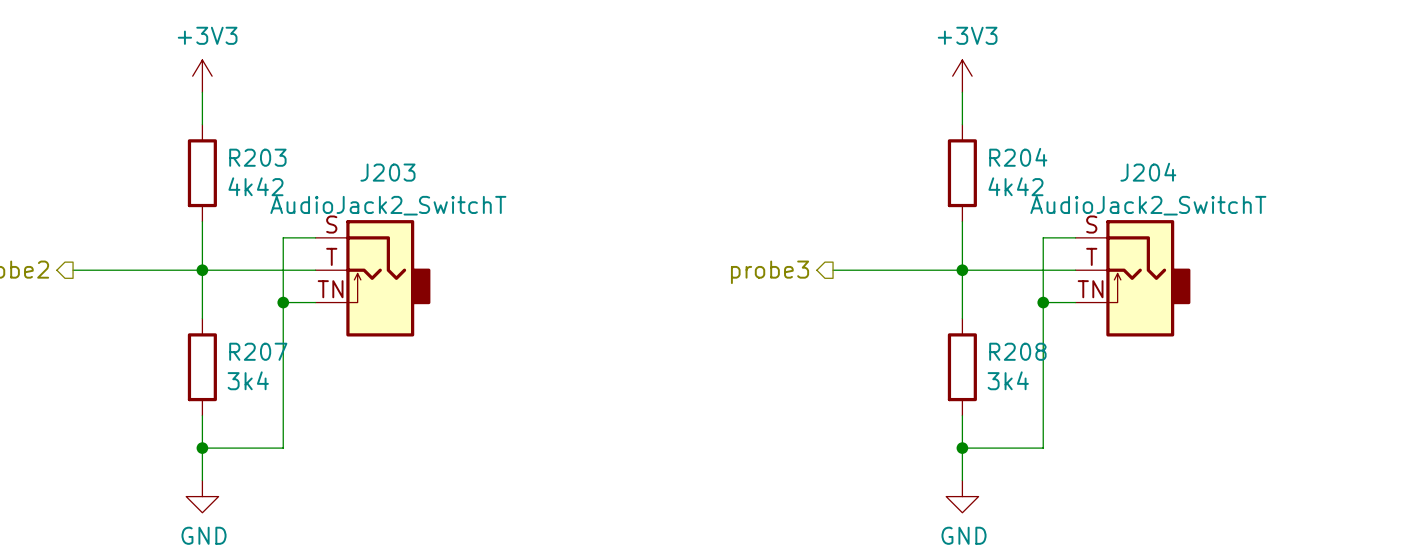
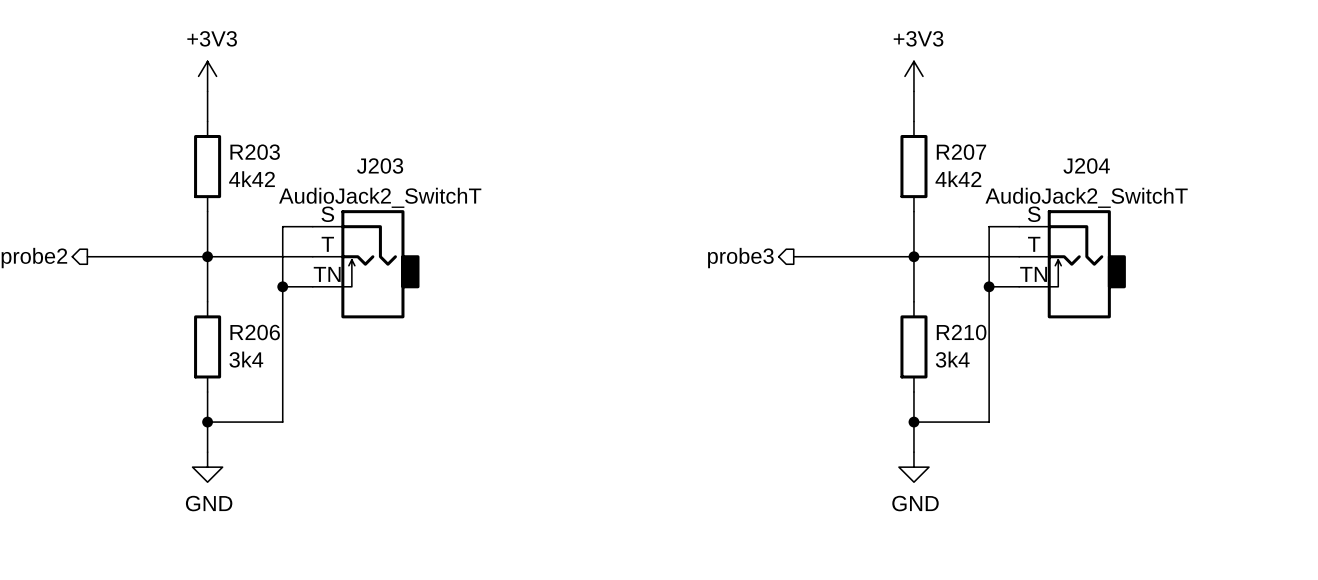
R204 name: R204 (1018, 157) -> R207 (961, 152)
R207 name: R207 (258, 351) -> R206 (255, 332)
R208 name: R208 (1017, 351) -> R210 (961, 332)

